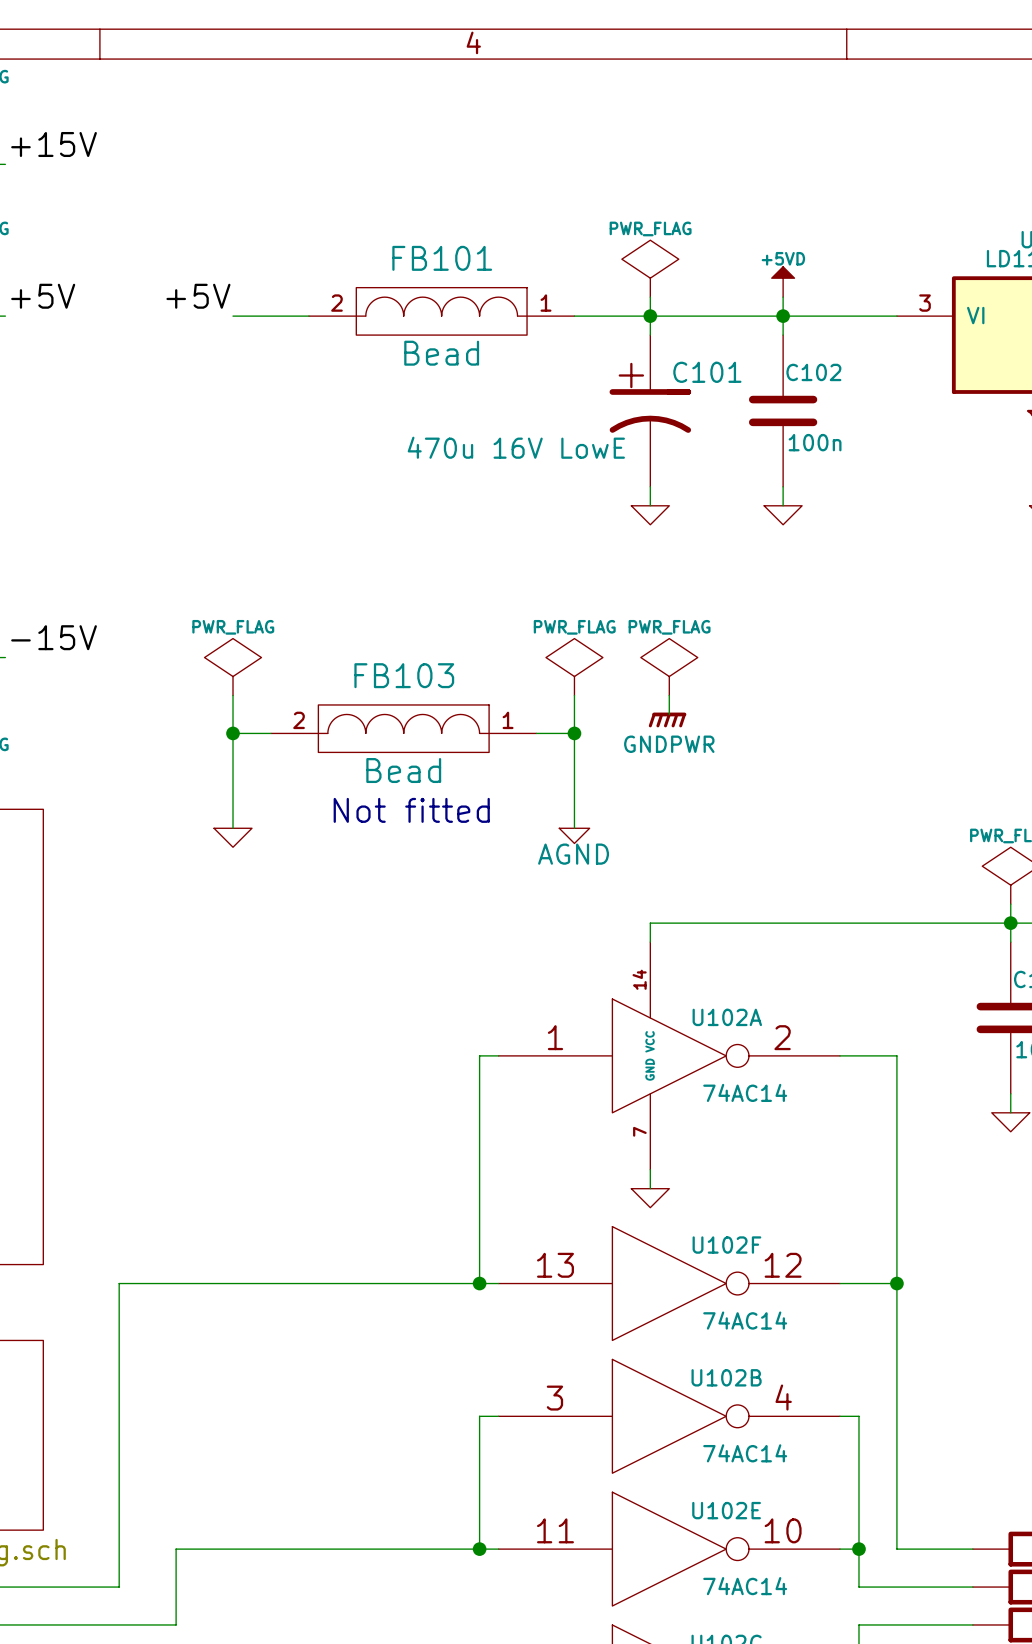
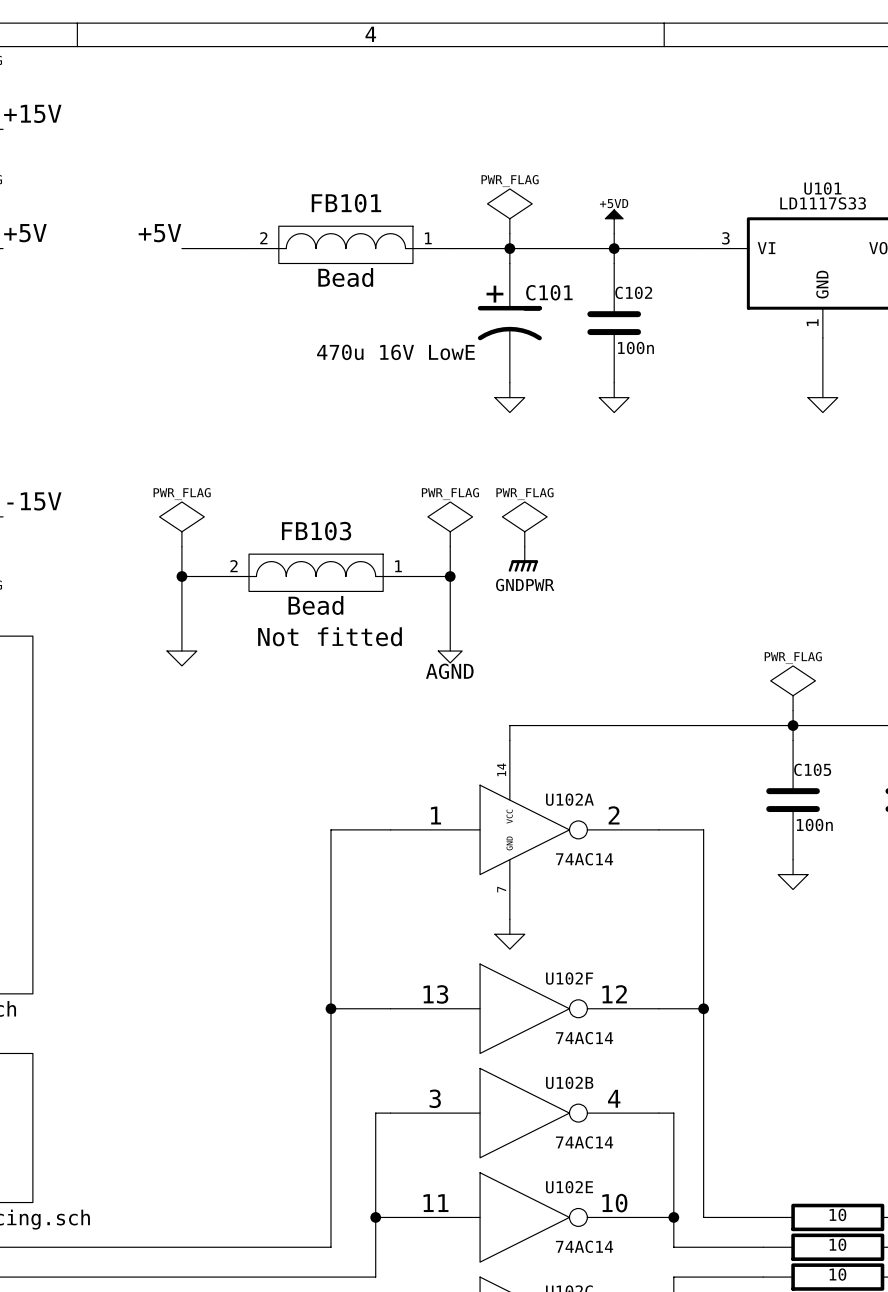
wire: (479, 1055) (479, 1283) -> none
wire: (422, 1283) (119, 1283) (119, 1587) -> (375, 829) (330, 829) (330, 1247) (92, 1247)
junction position: (479, 1283) -> (330, 1008)
wire: (479, 1549) (176, 1549) (176, 1624) -> (375, 1217) (375, 1277) (137, 1277)

